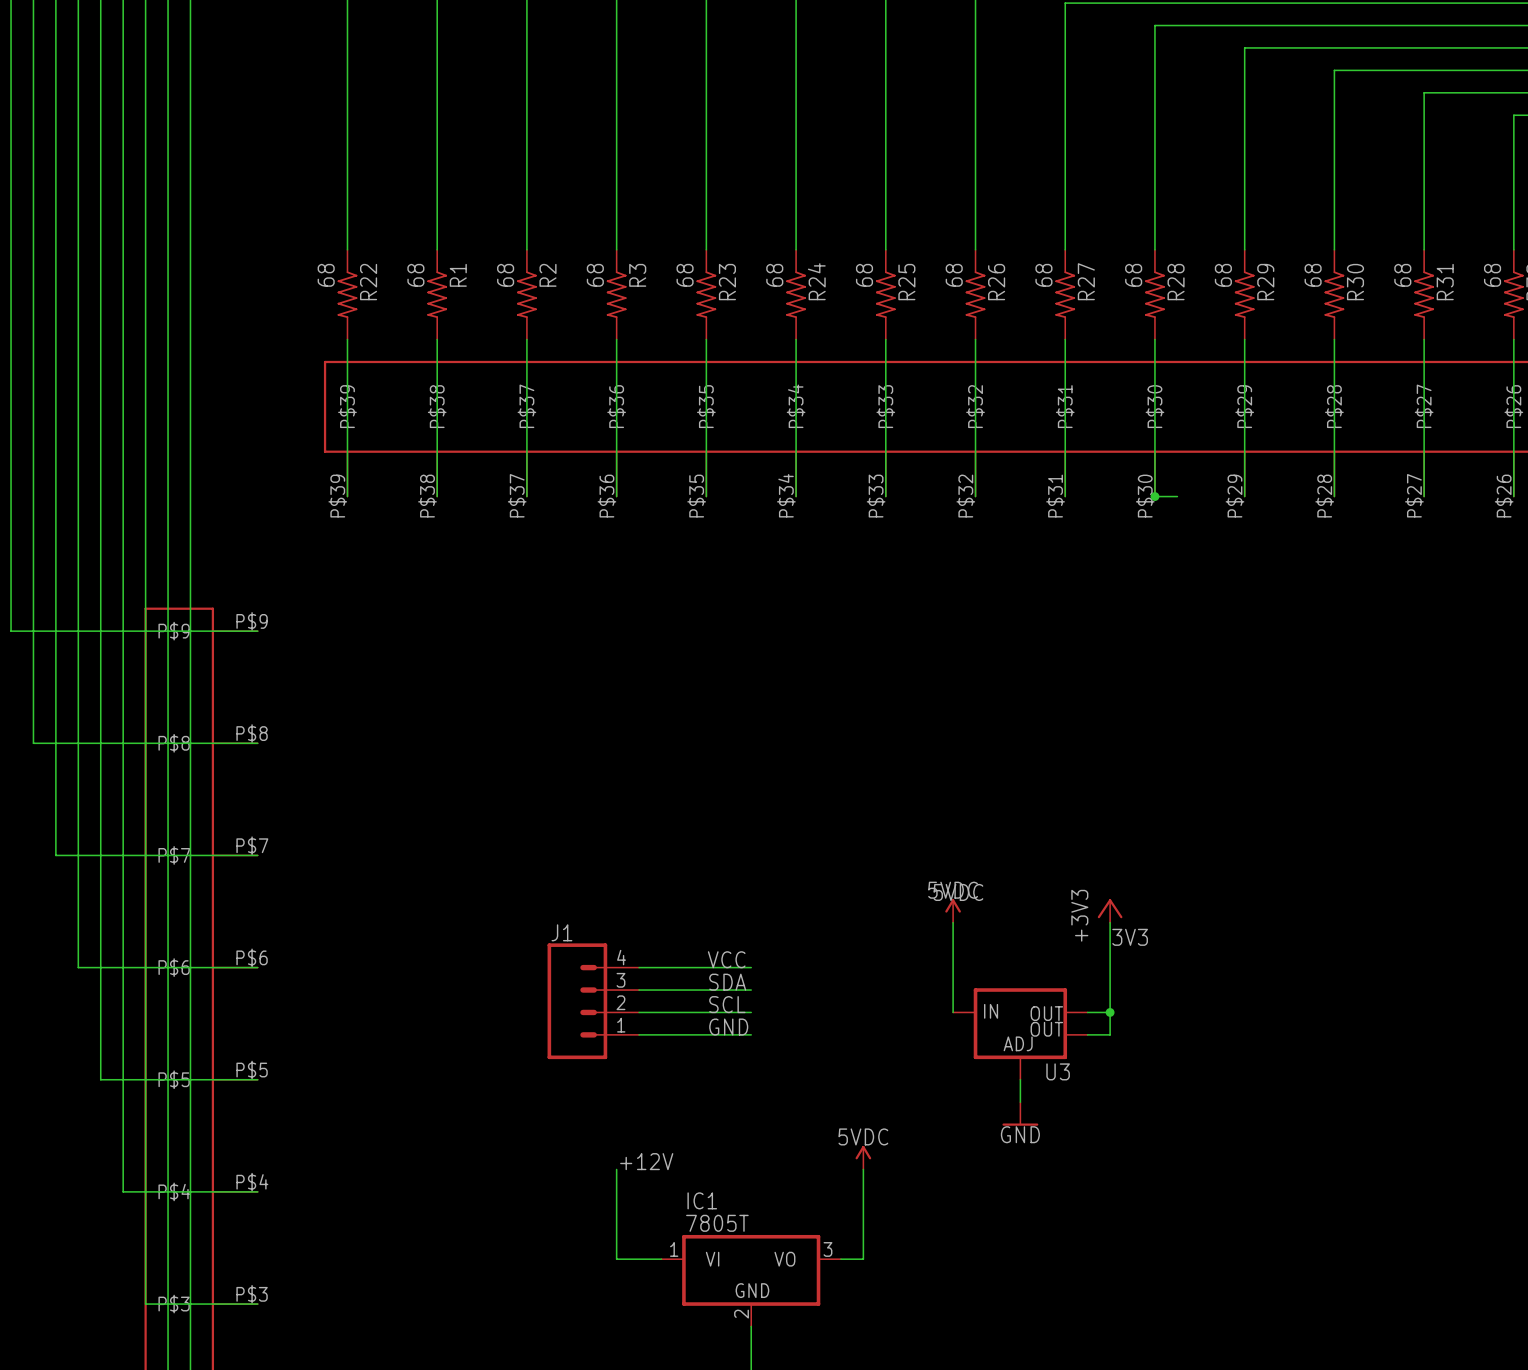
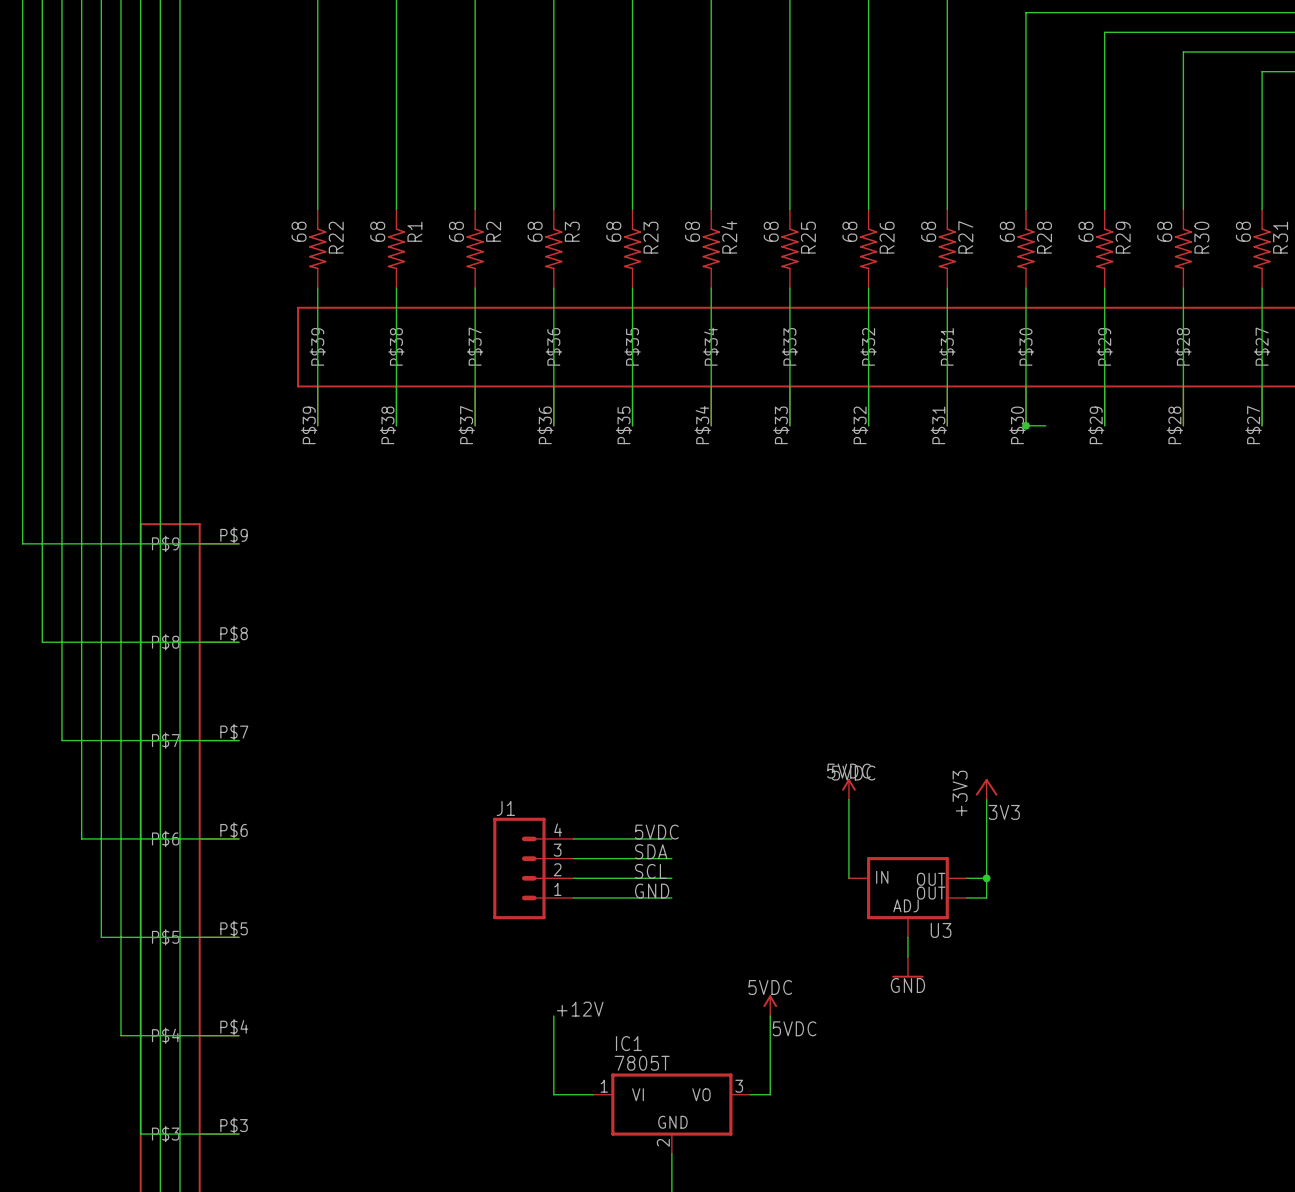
label: VCC (726, 959) -> 5VDC (656, 832)
label: none -> 5VDC (794, 1028)

